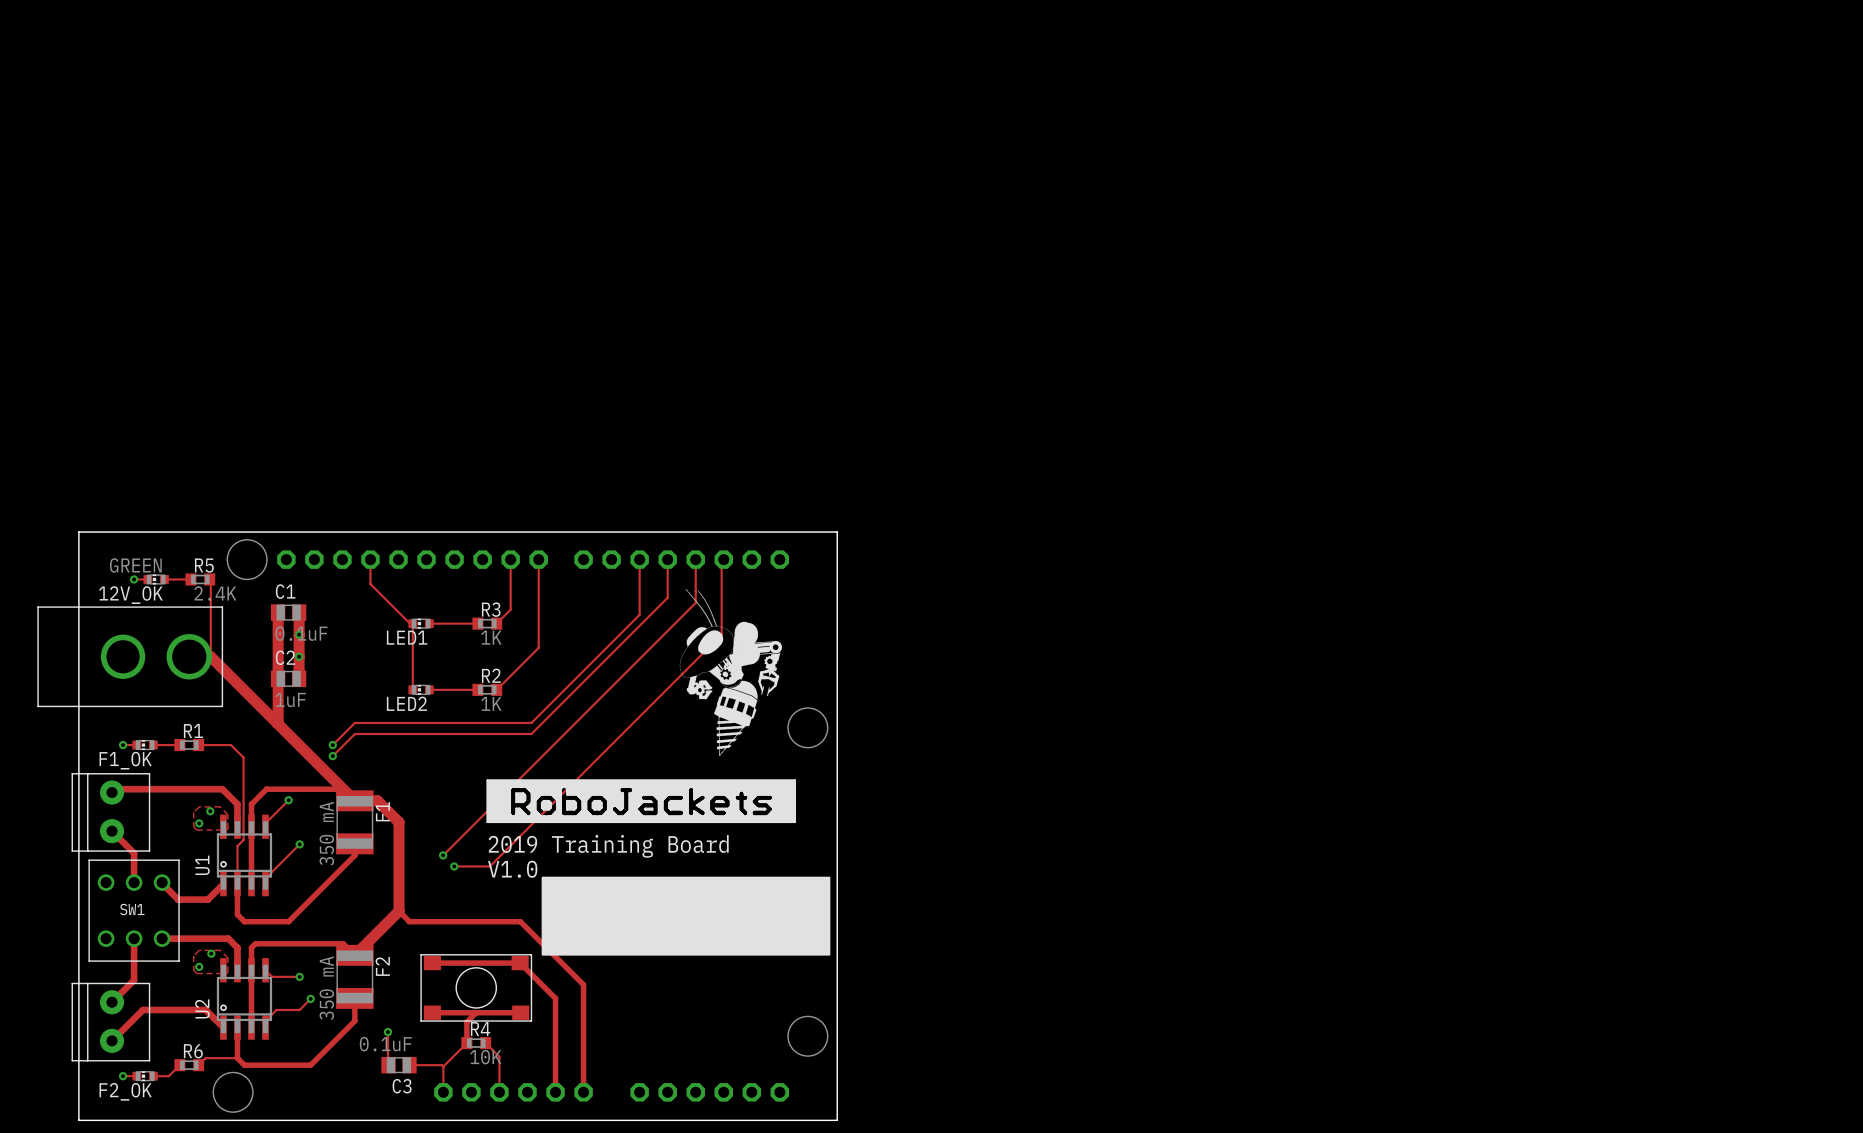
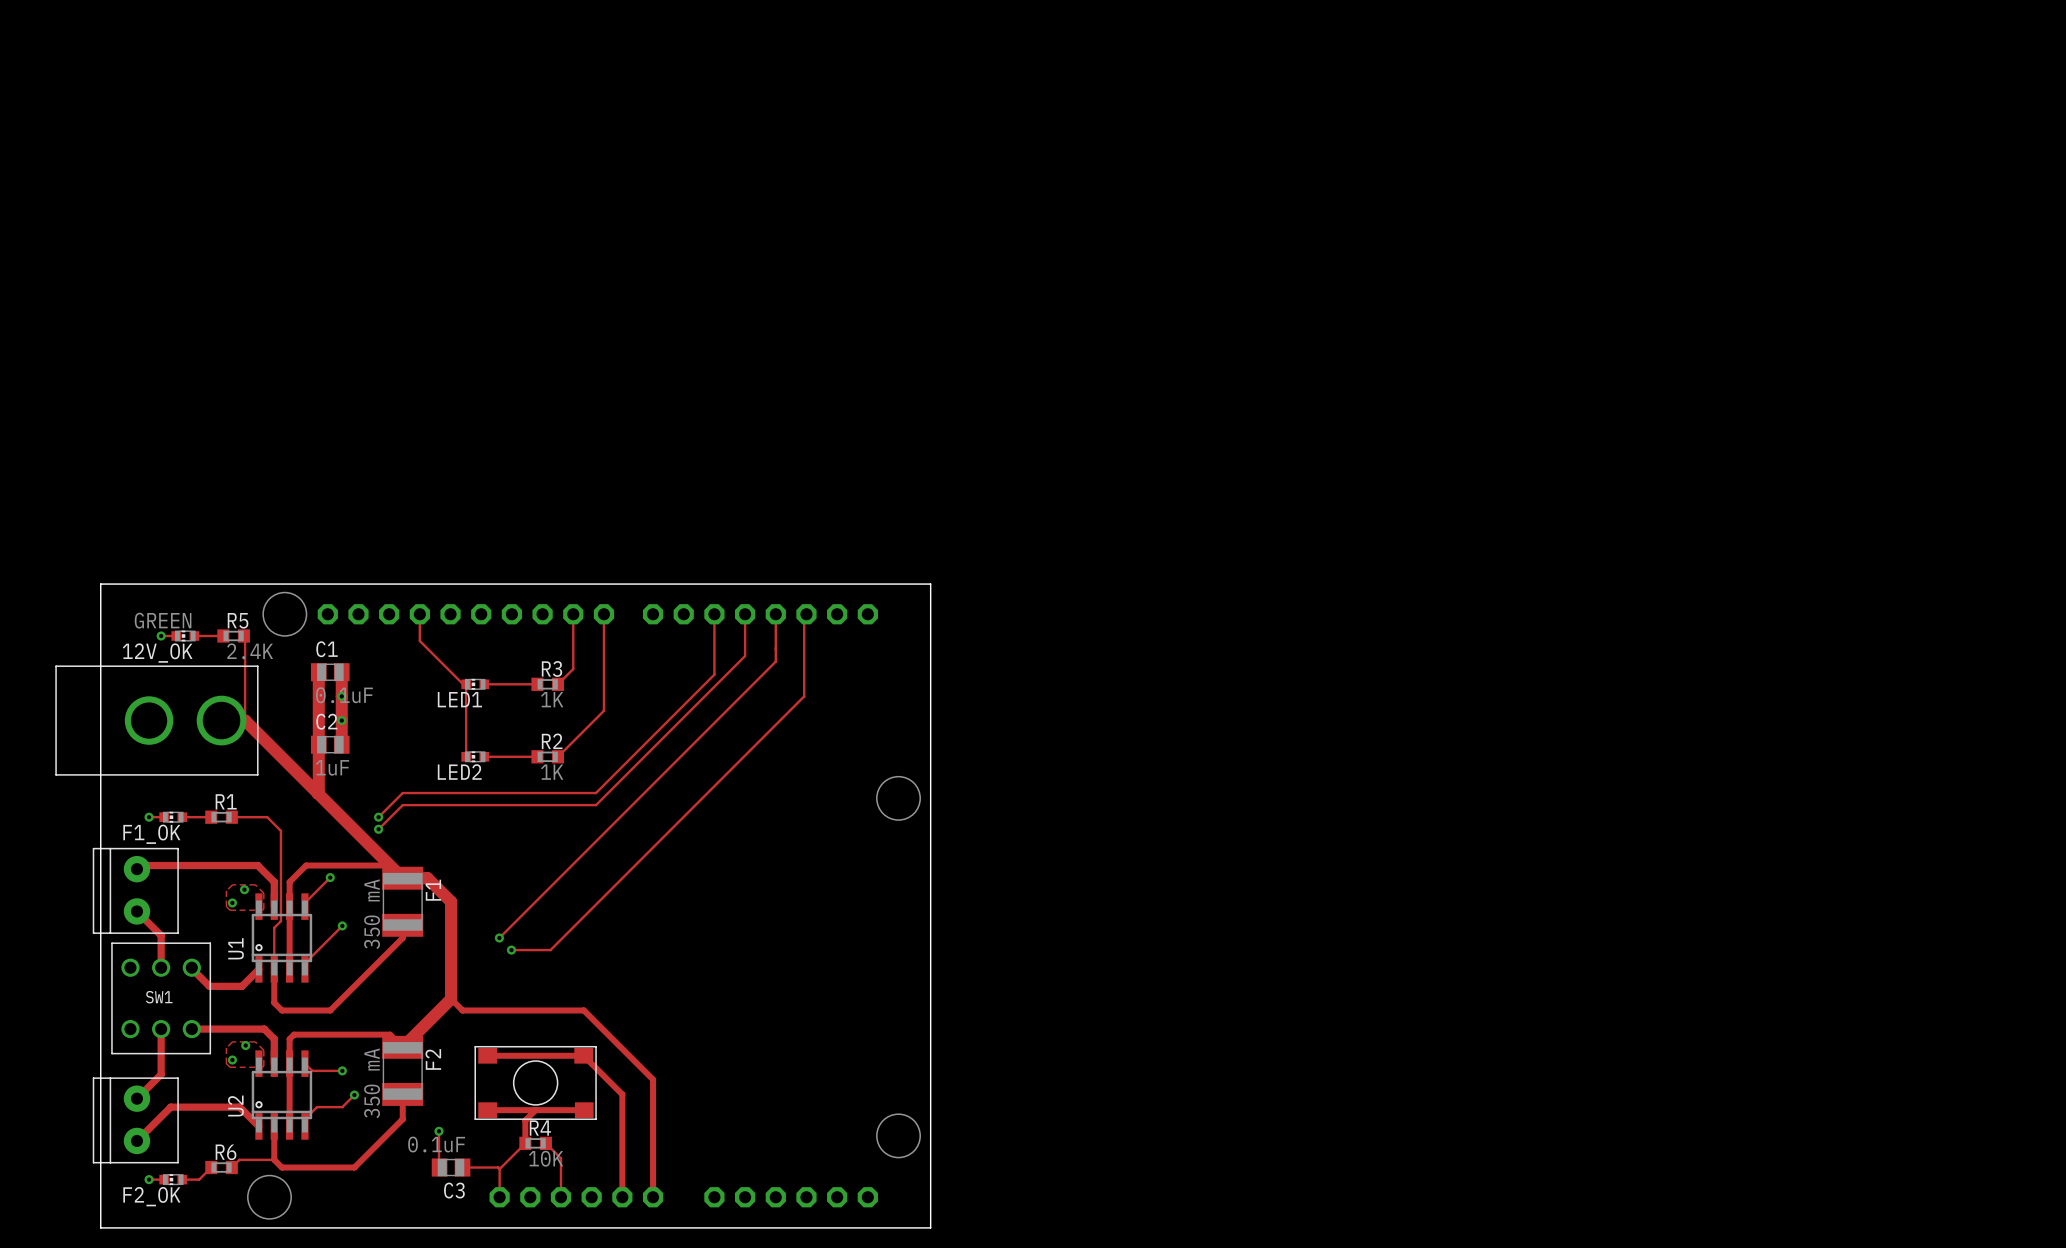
drawing: [679, 588, 783, 757] -> none
drawing: [486, 779, 796, 823] -> none
text: 2019 Training Board (608, 846) -> none
text: V1.0 (512, 869) -> none
drawing: [541, 876, 831, 956] -> none

